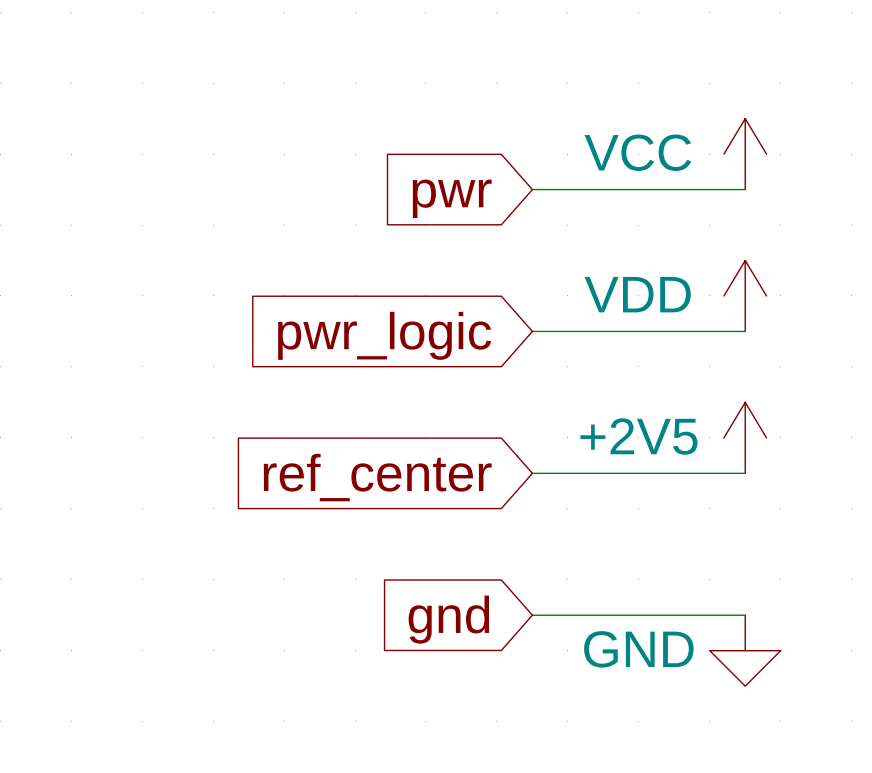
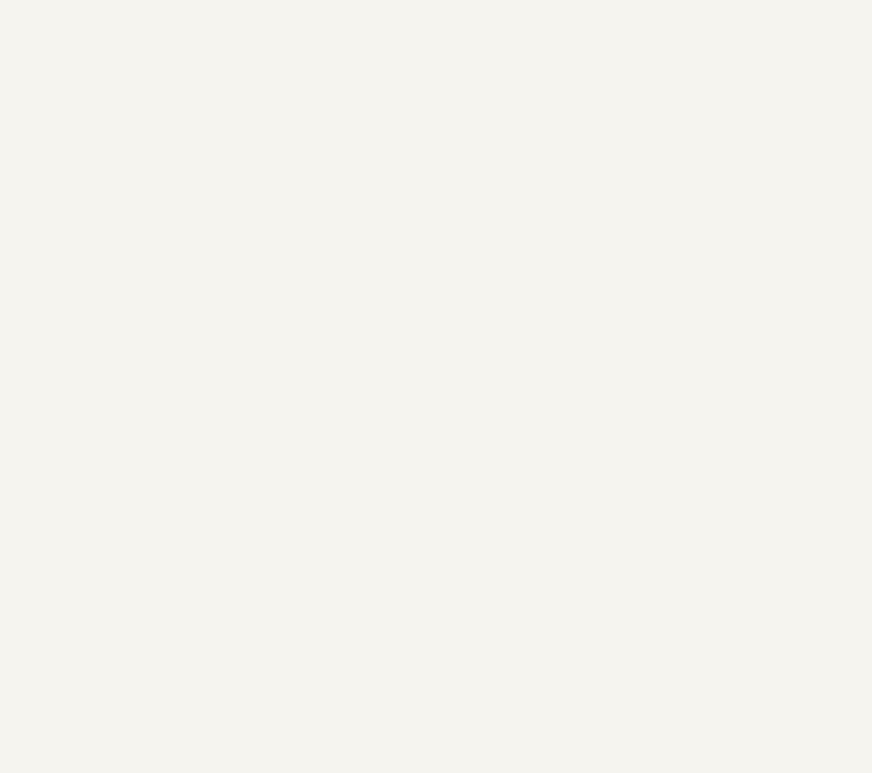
power symbol: VCC (745, 154) -> none
wire: (532, 189) (745, 189) -> none
global label: pwr (452, 198) -> none
power symbol: VDD (745, 295) -> none
wire: (532, 331) (745, 331) -> none
global label: pwr_logic (384, 335) -> none
power symbol: +2V5 (745, 437) -> none
wire: (532, 473) (745, 473) -> none
global label: ref_center (377, 477) -> none
wire: (532, 615) (745, 615) -> none
global label: gnd (448, 619) -> none
power symbol: GND (745, 650) -> none

